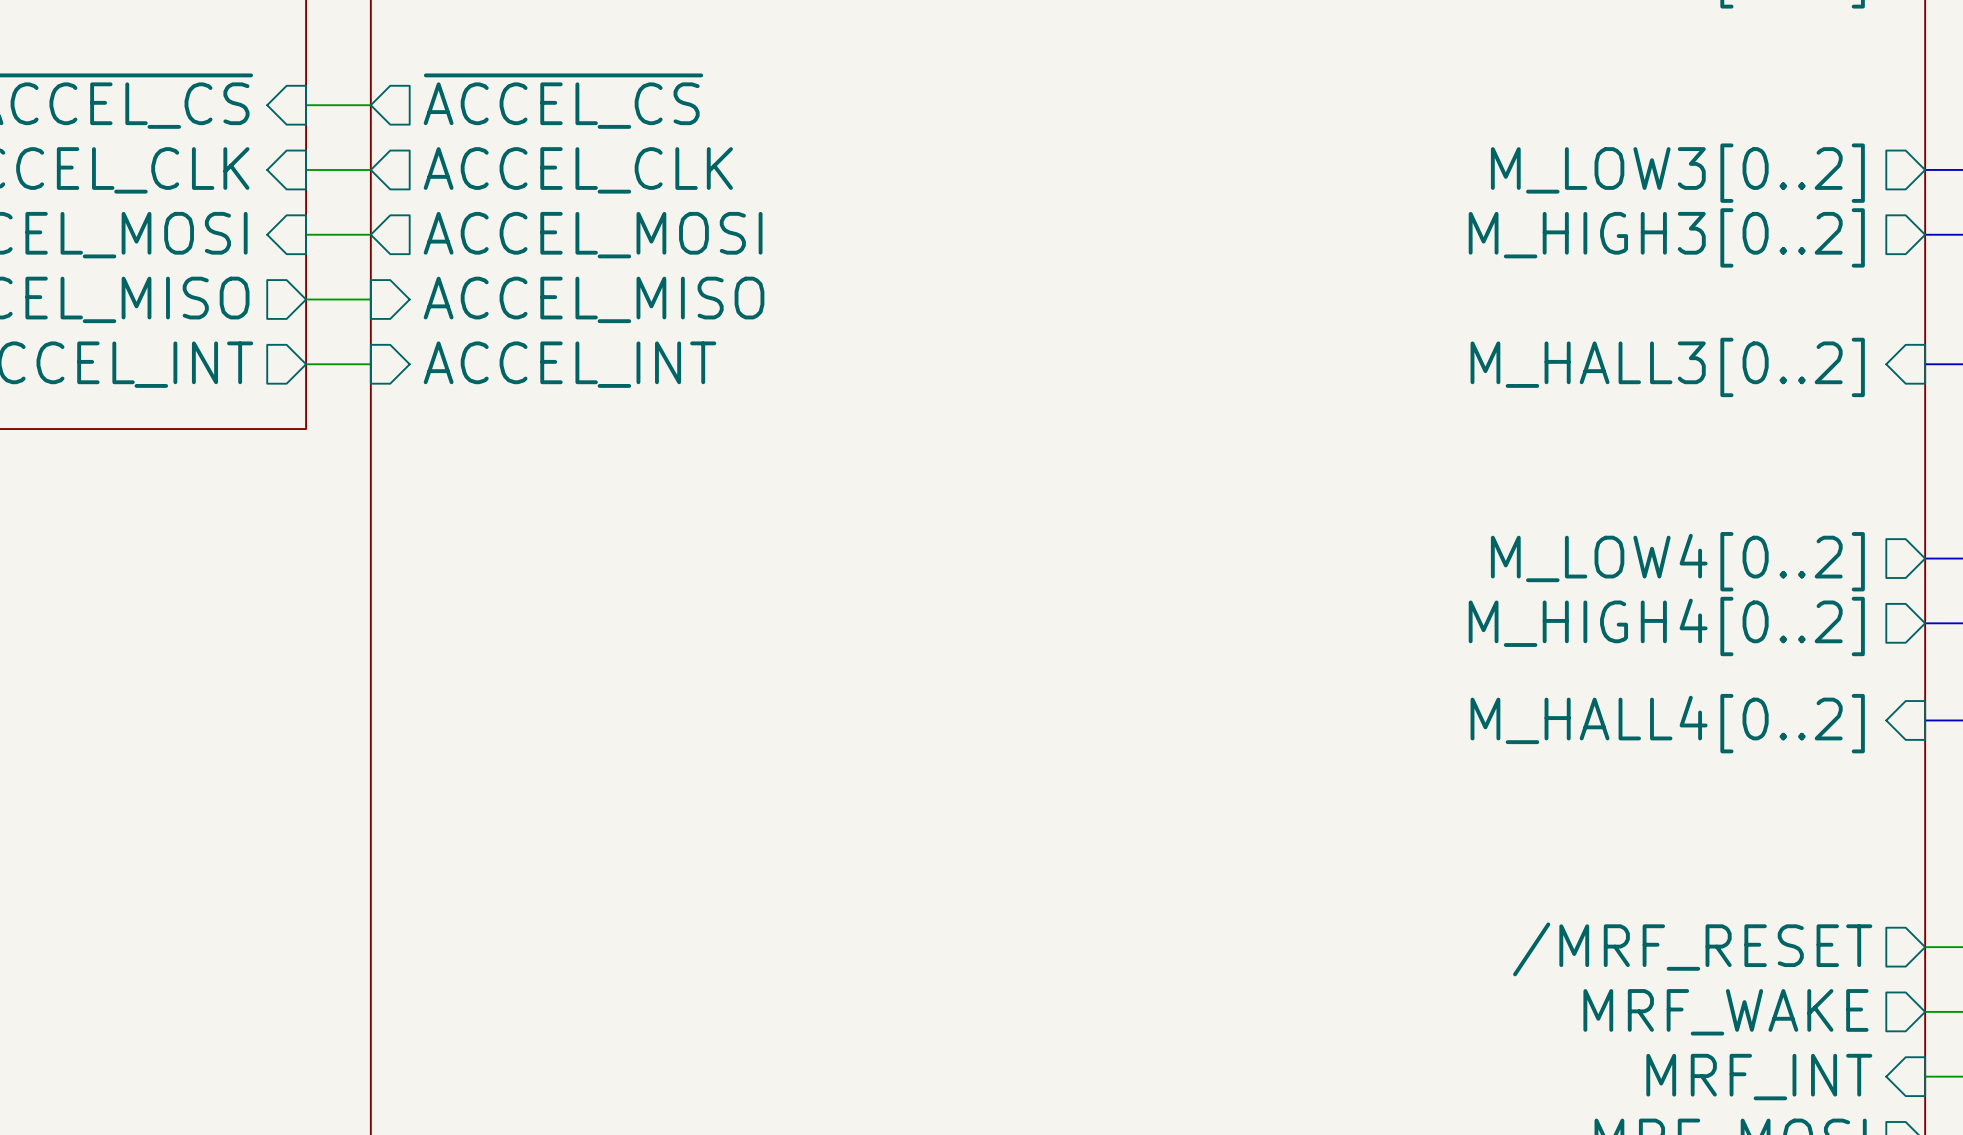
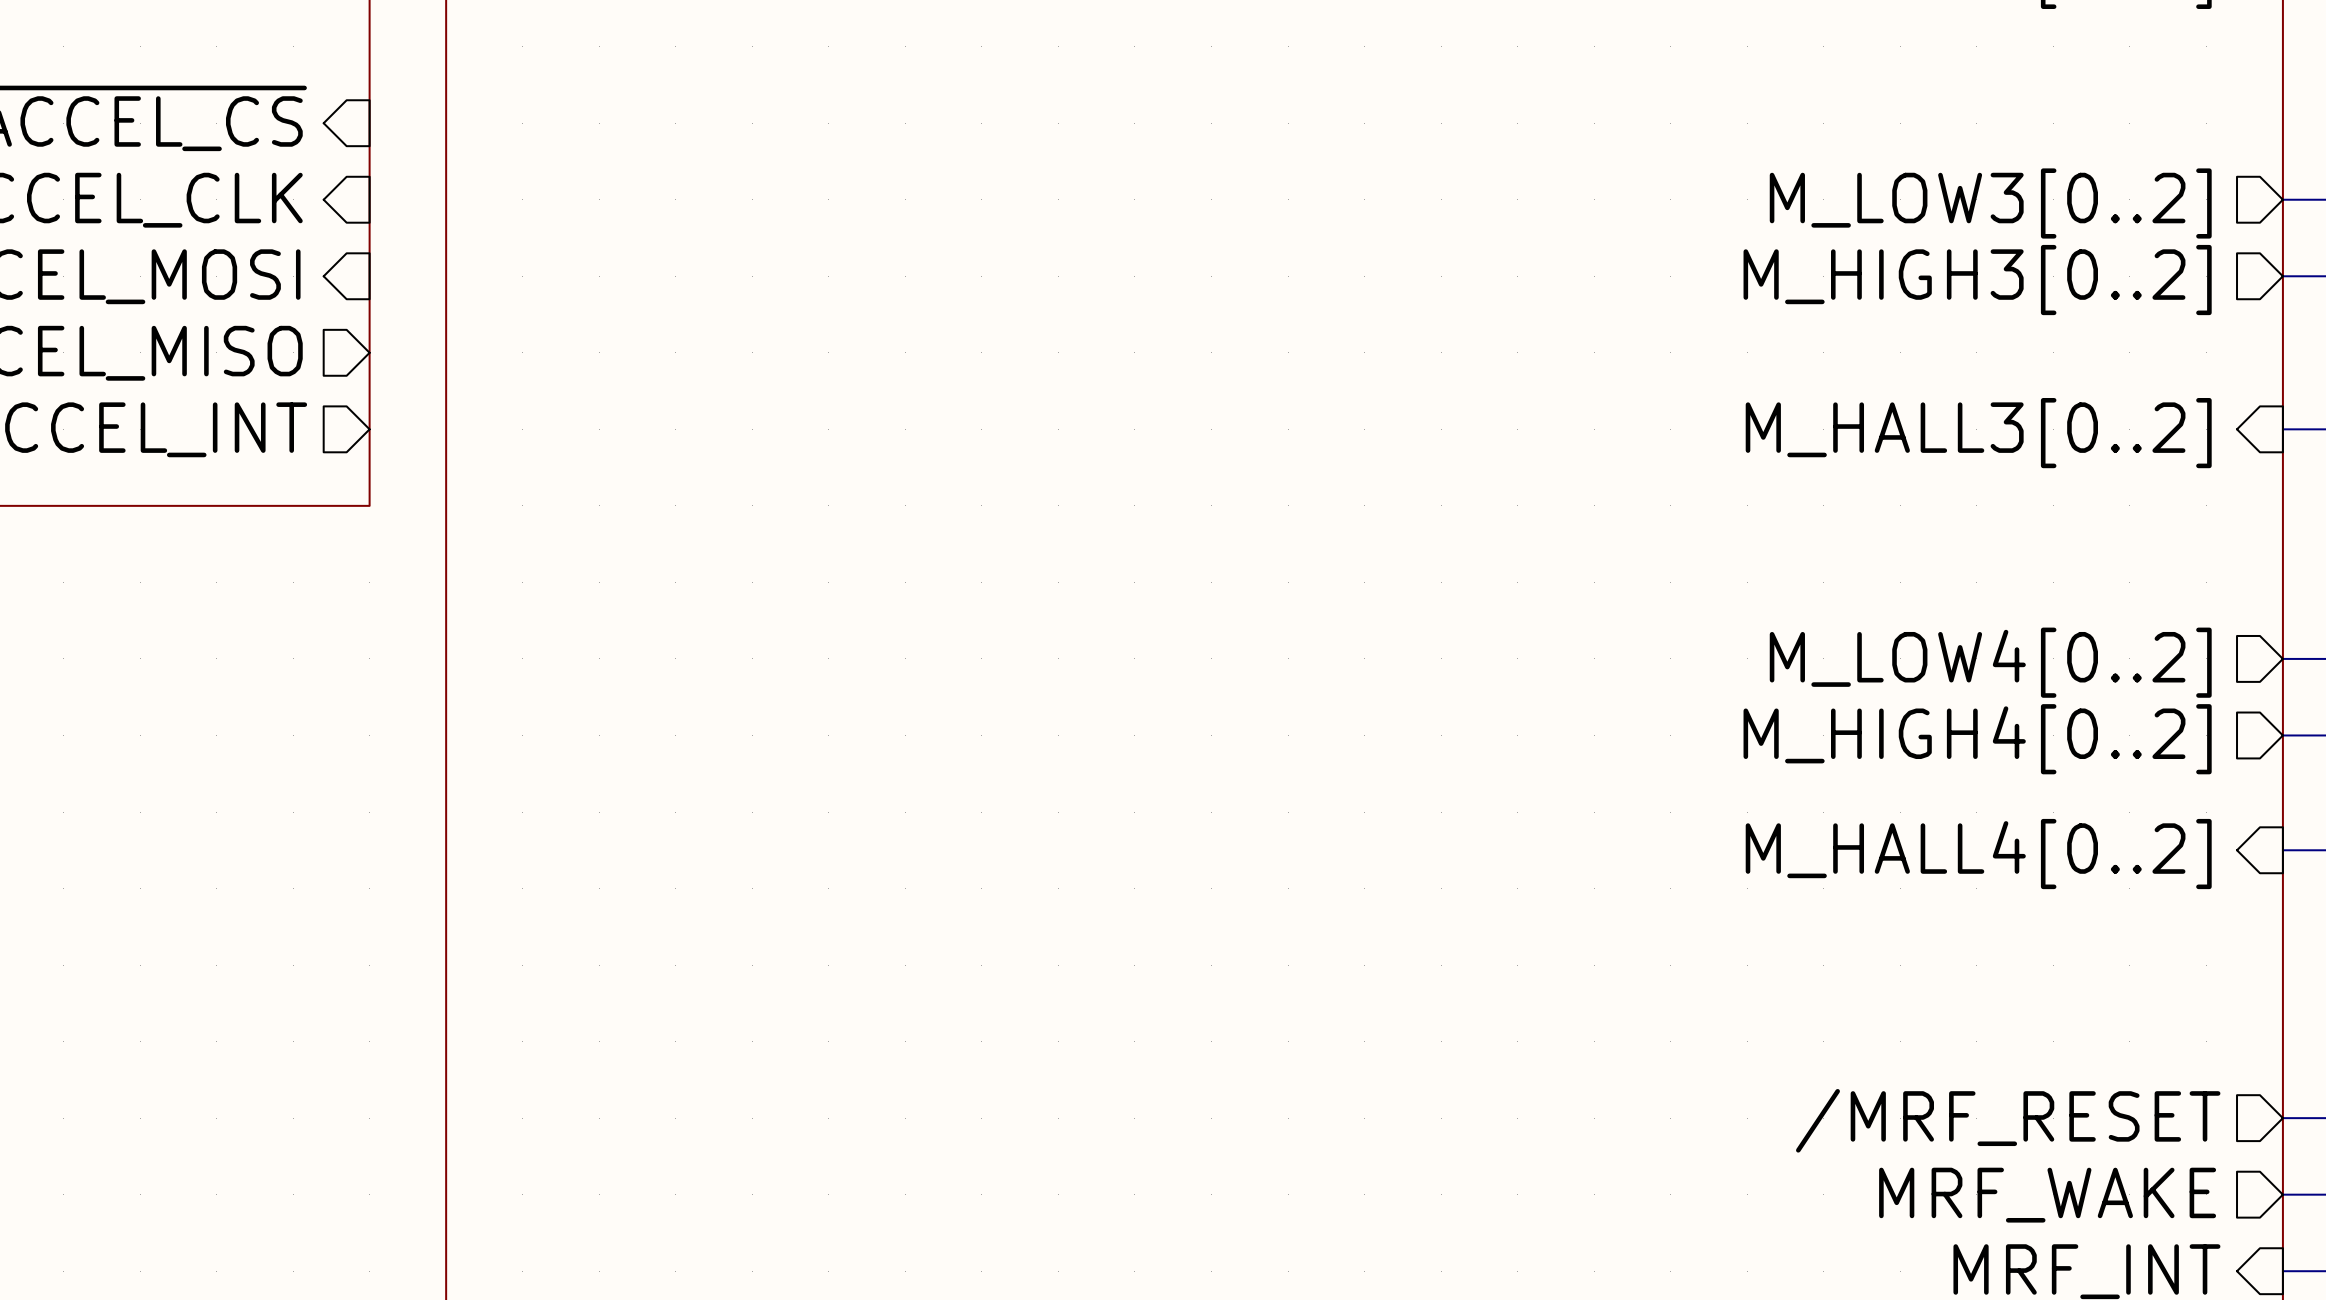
sheet pin: ~{ACCEL_CS} (563, 101) -> none
wire: (306, 105) (370, 105) -> none
wire: (306, 169) (370, 169) -> none
sheet pin: ACCEL_CLK (578, 170) -> none
wire: (306, 234) (370, 234) -> none
sheet pin: ACCEL_MOSI (593, 235) -> none
wire: (306, 299) (370, 299) -> none
sheet pin: ACCEL_MISO (594, 299) -> none
wire: (306, 364) (370, 364) -> none
sheet pin: ACCEL_INT (569, 364) -> none

